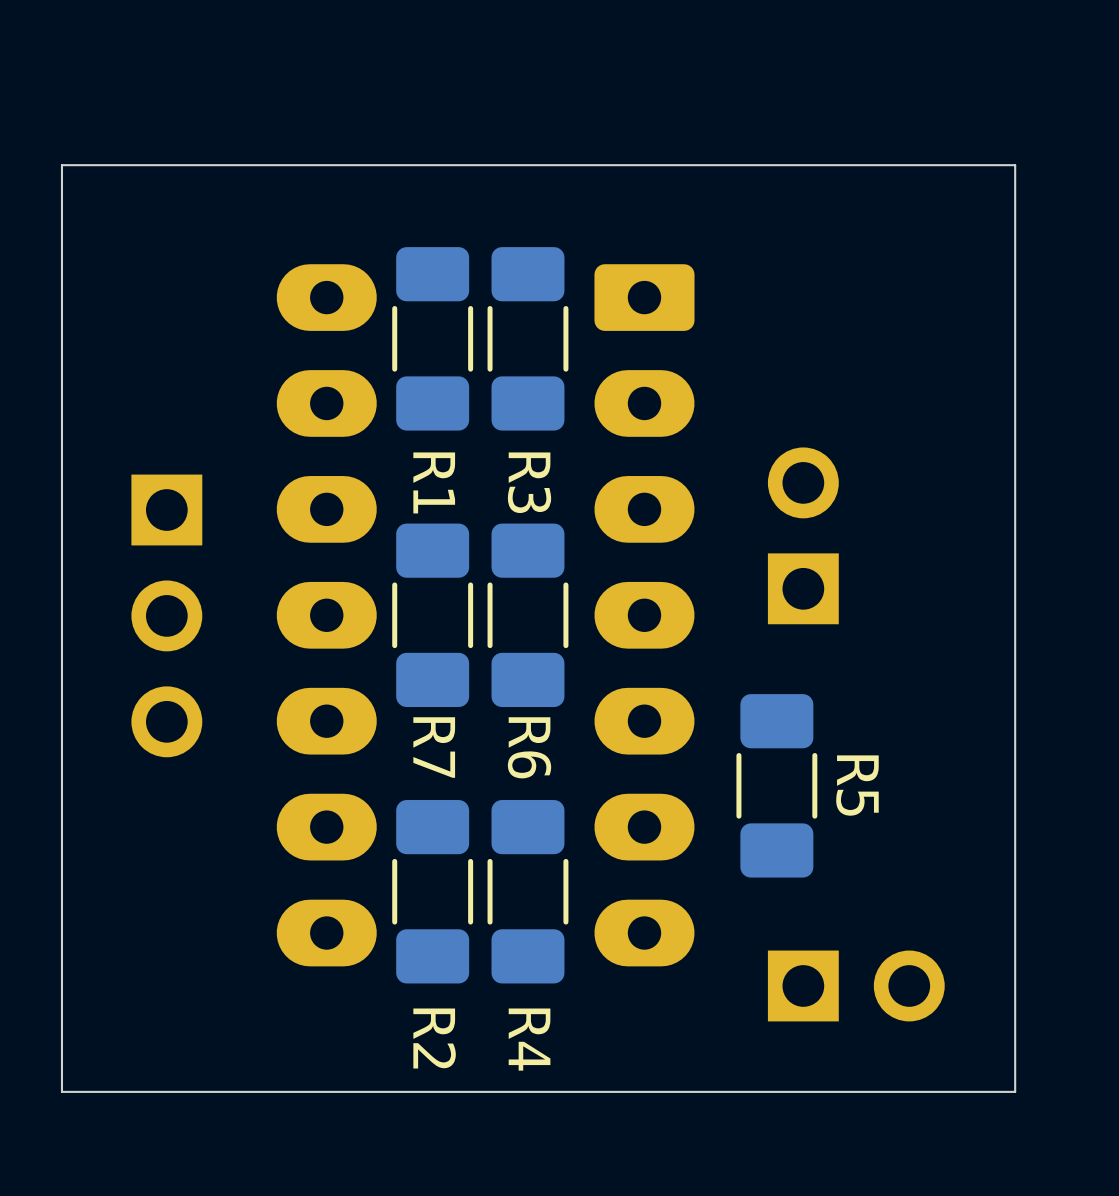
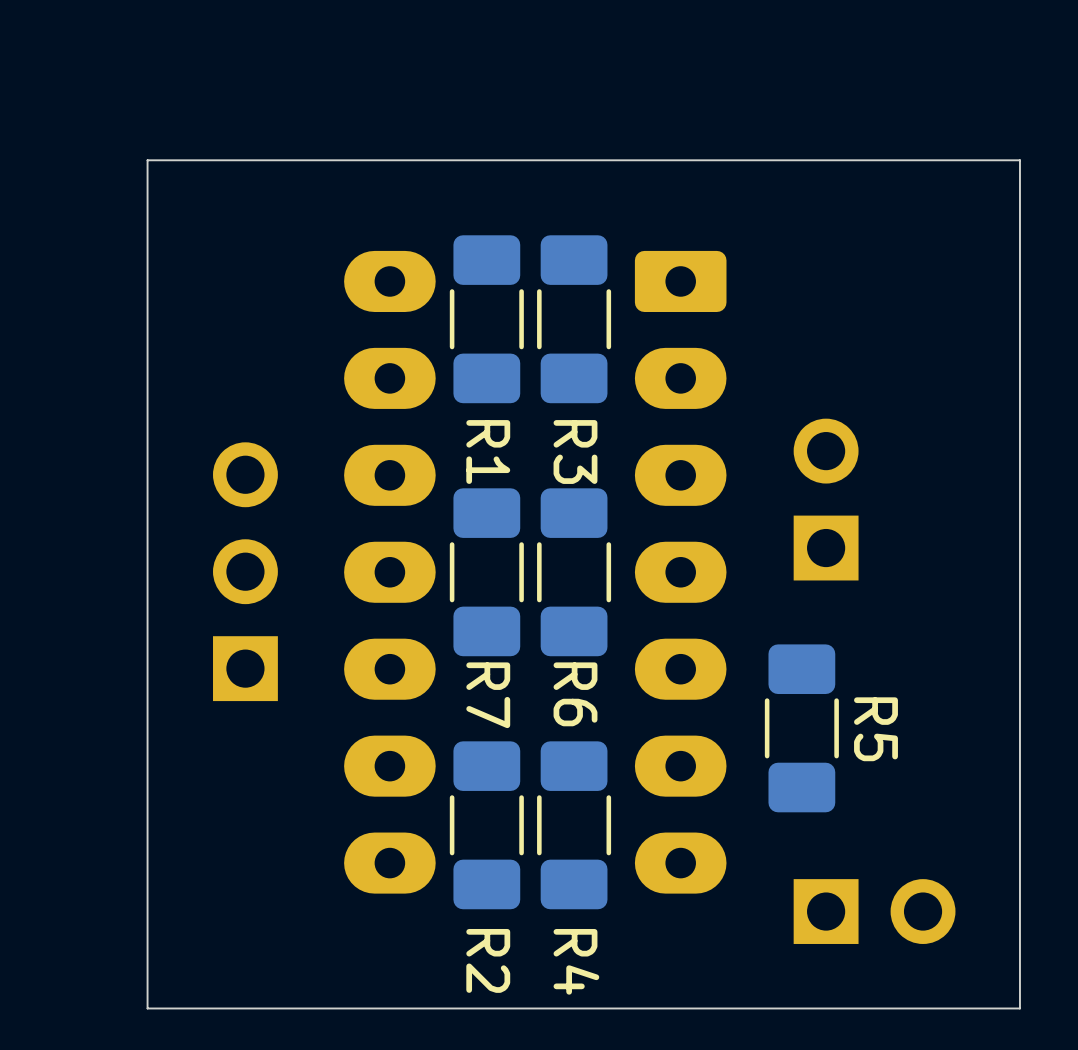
part rotation: 0° (166, 615) -> 180° (245, 571)

